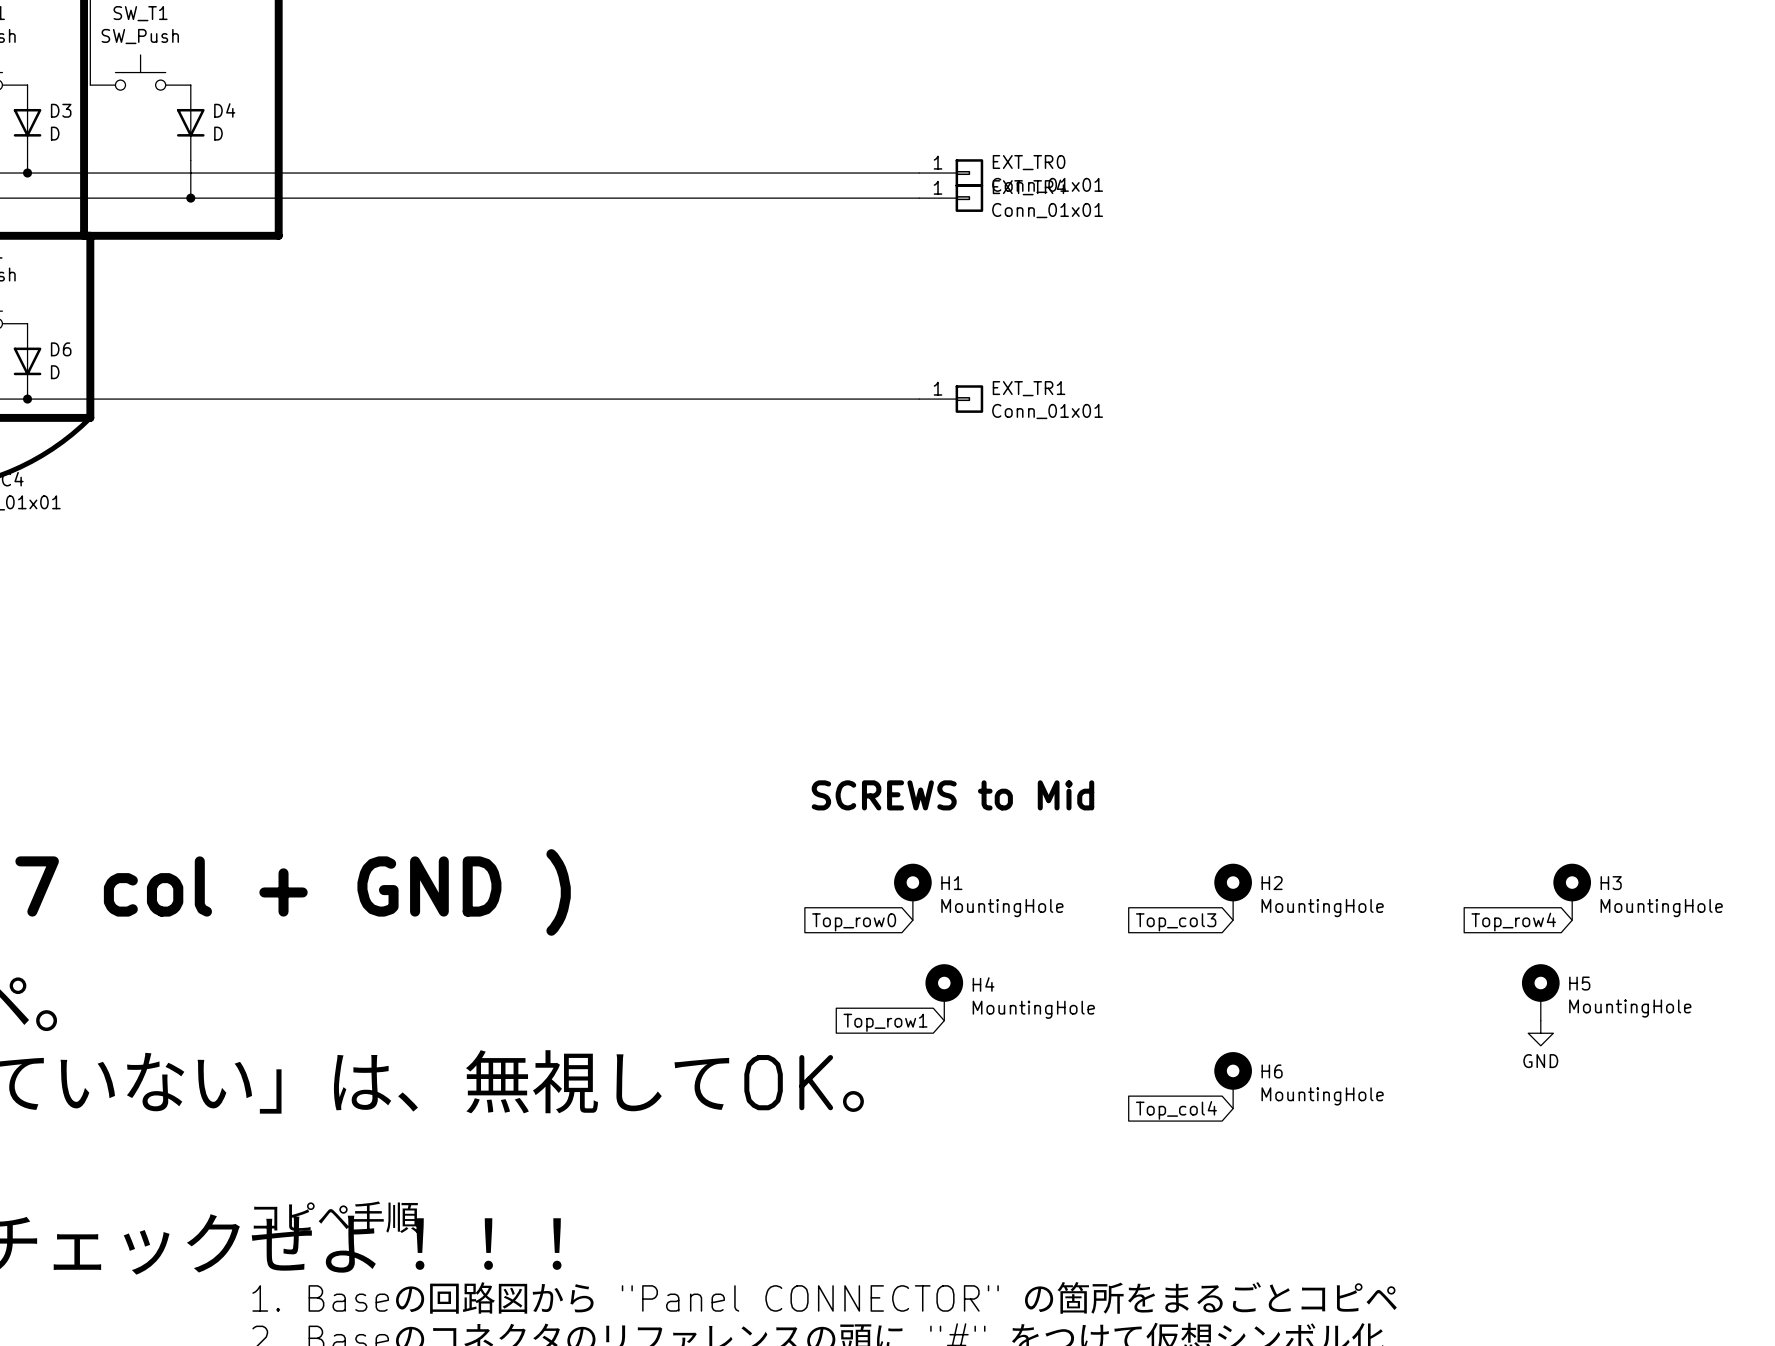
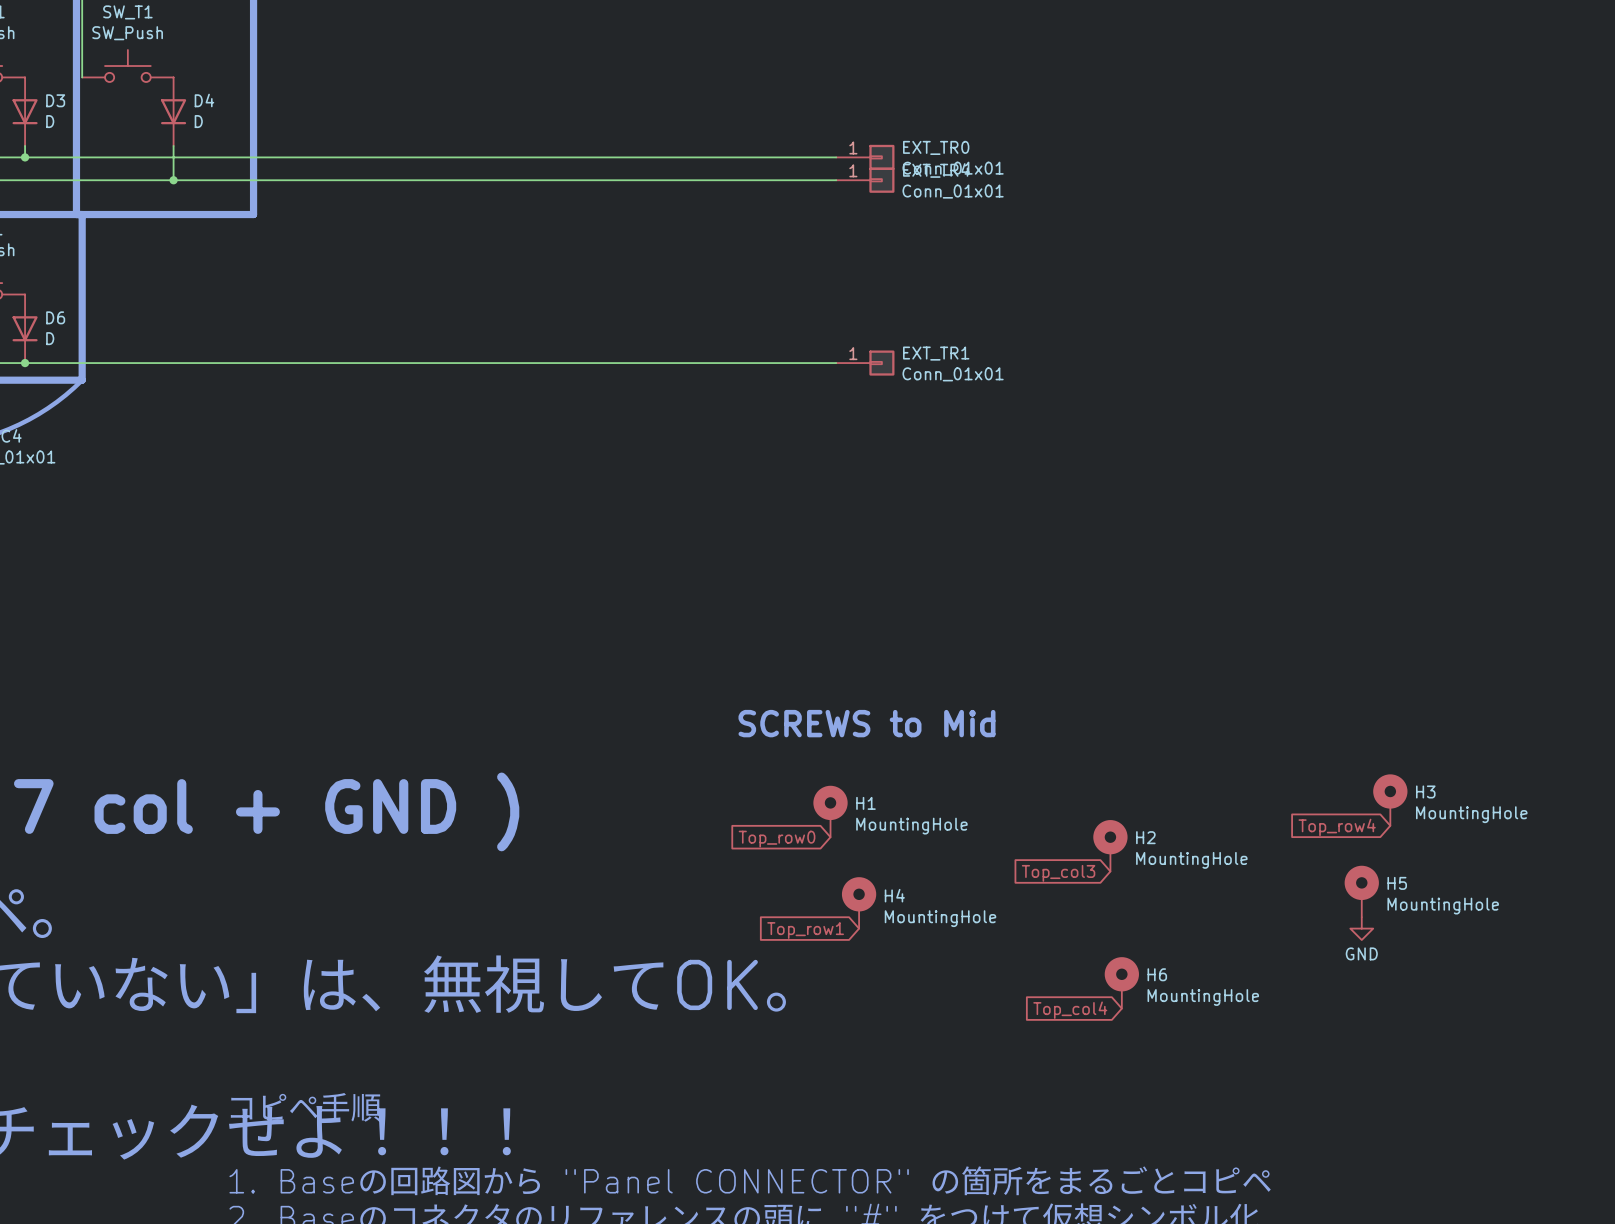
H2 position: (1233, 891) -> (1110, 845)
H3 position: (1572, 891) -> (1390, 800)
global label position: Top_col3 (1176, 922) -> Top_col3 (1058, 873)
global label position: Top_row4 (1513, 922) -> Top_row4 (1337, 827)
H5 position: (1540, 992) -> (1361, 891)
power symbol position: GND (1540, 1033) -> GND (1361, 928)

